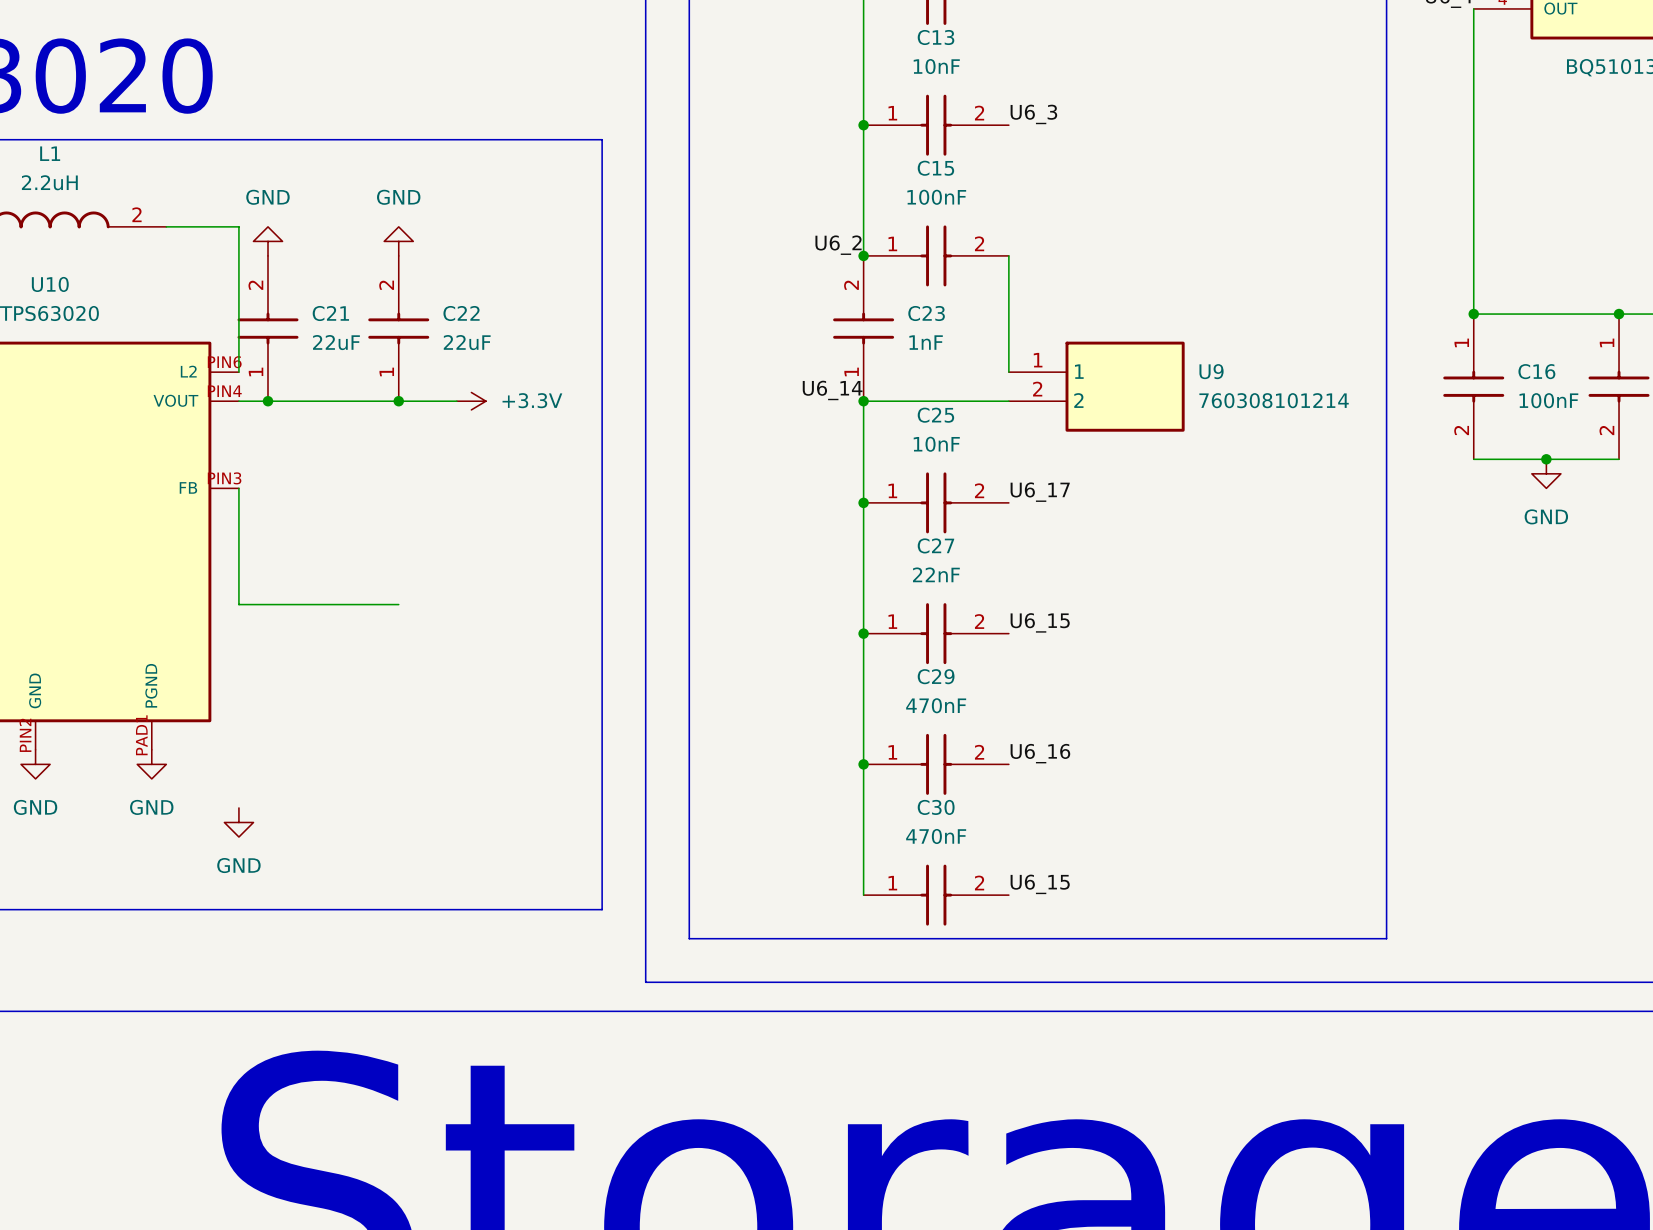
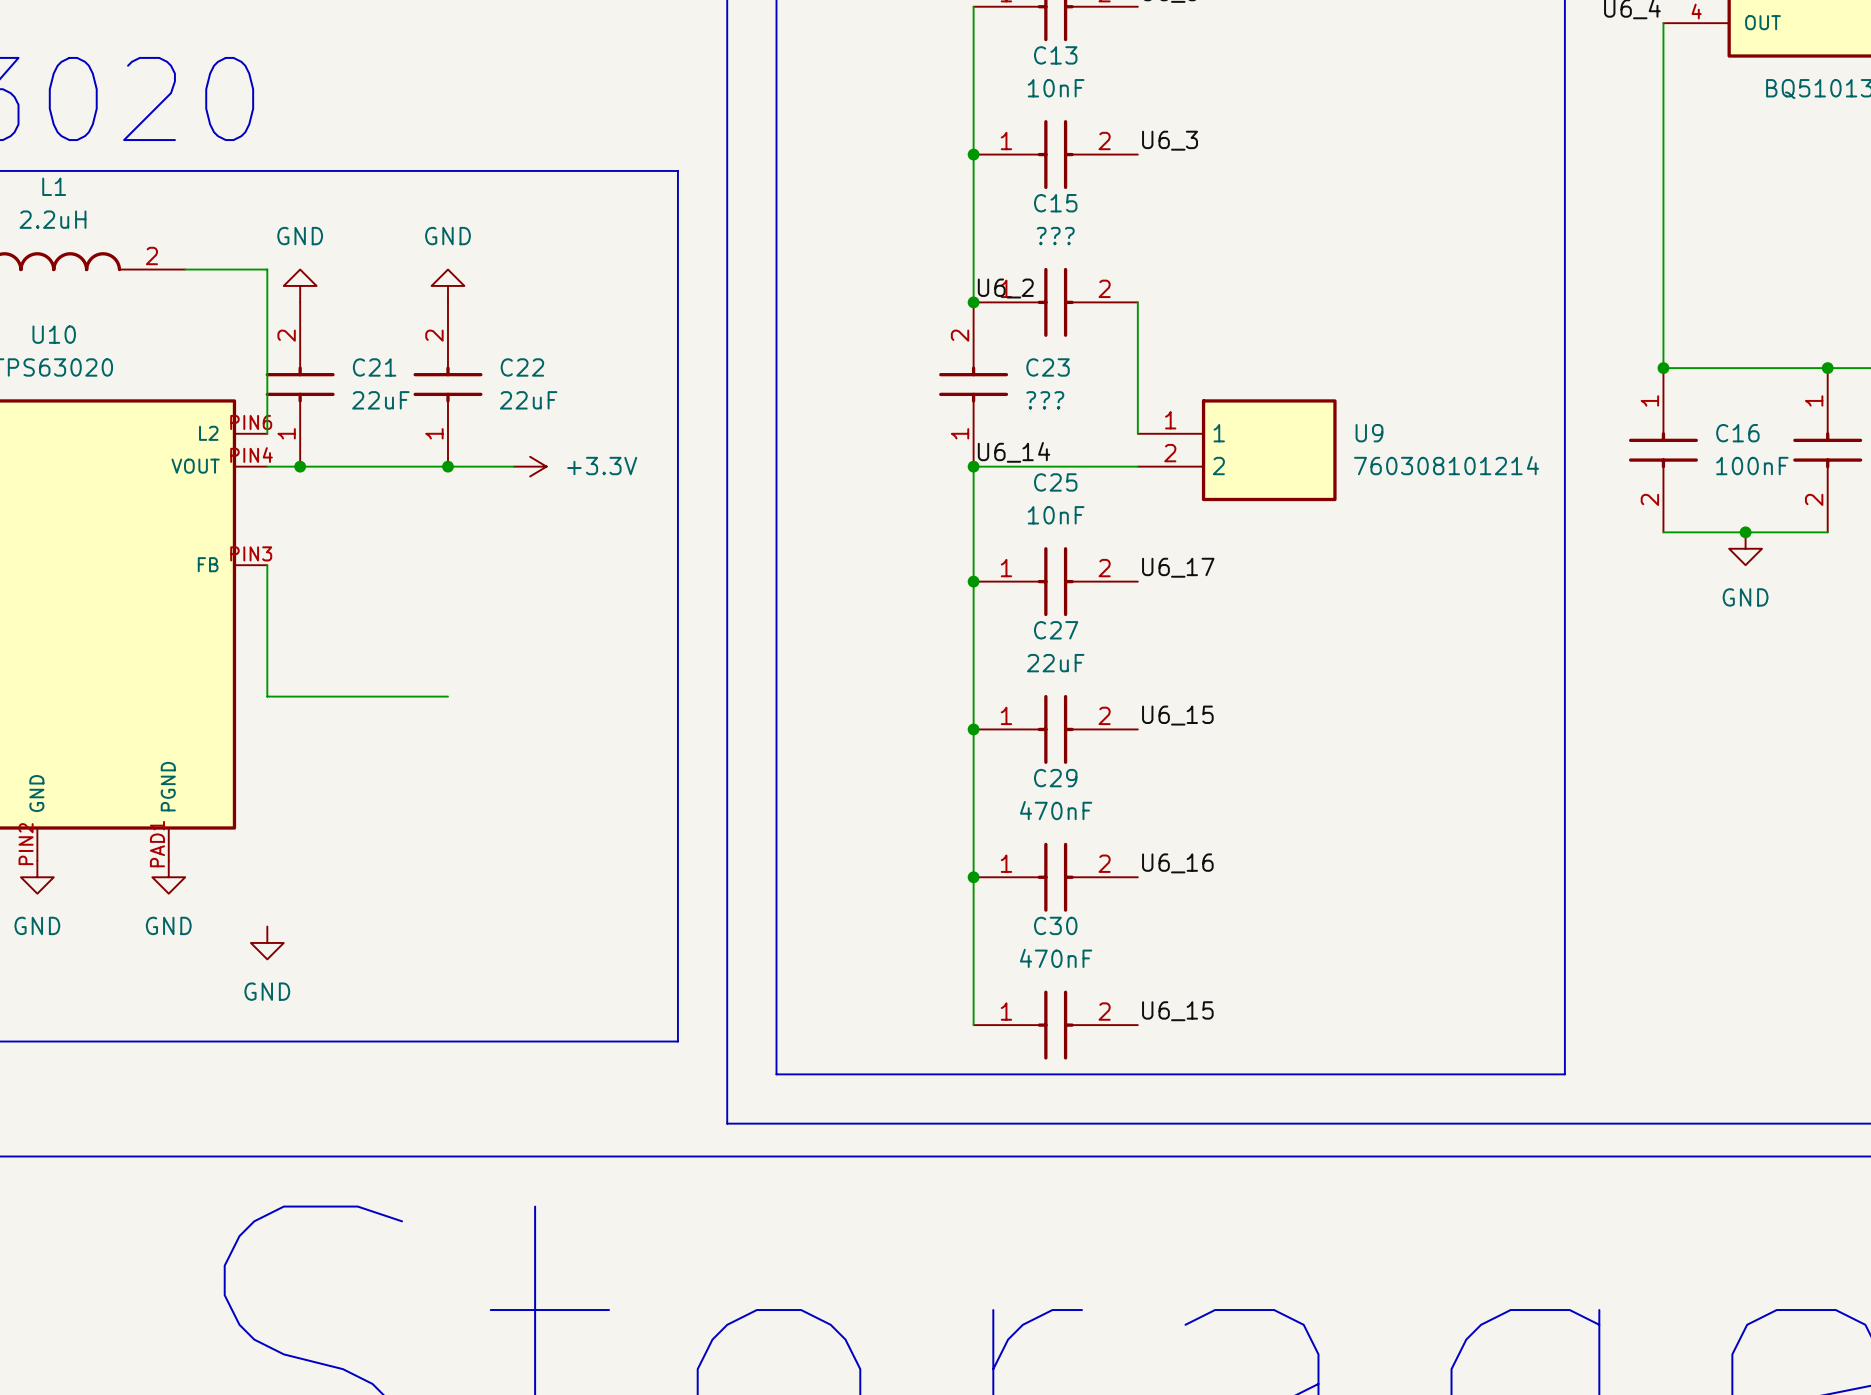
C15 value: 100nF (936, 197) -> ??? (1055, 236)
label position: U6_2 (838, 245) -> U6_2 (1005, 288)
C23 value: 1nF (926, 342) -> ??? (1045, 400)
label position: U6_14 (832, 390) -> U6_14 (1014, 452)
C27 value: 22nF (936, 574) -> 22uF (1055, 663)

